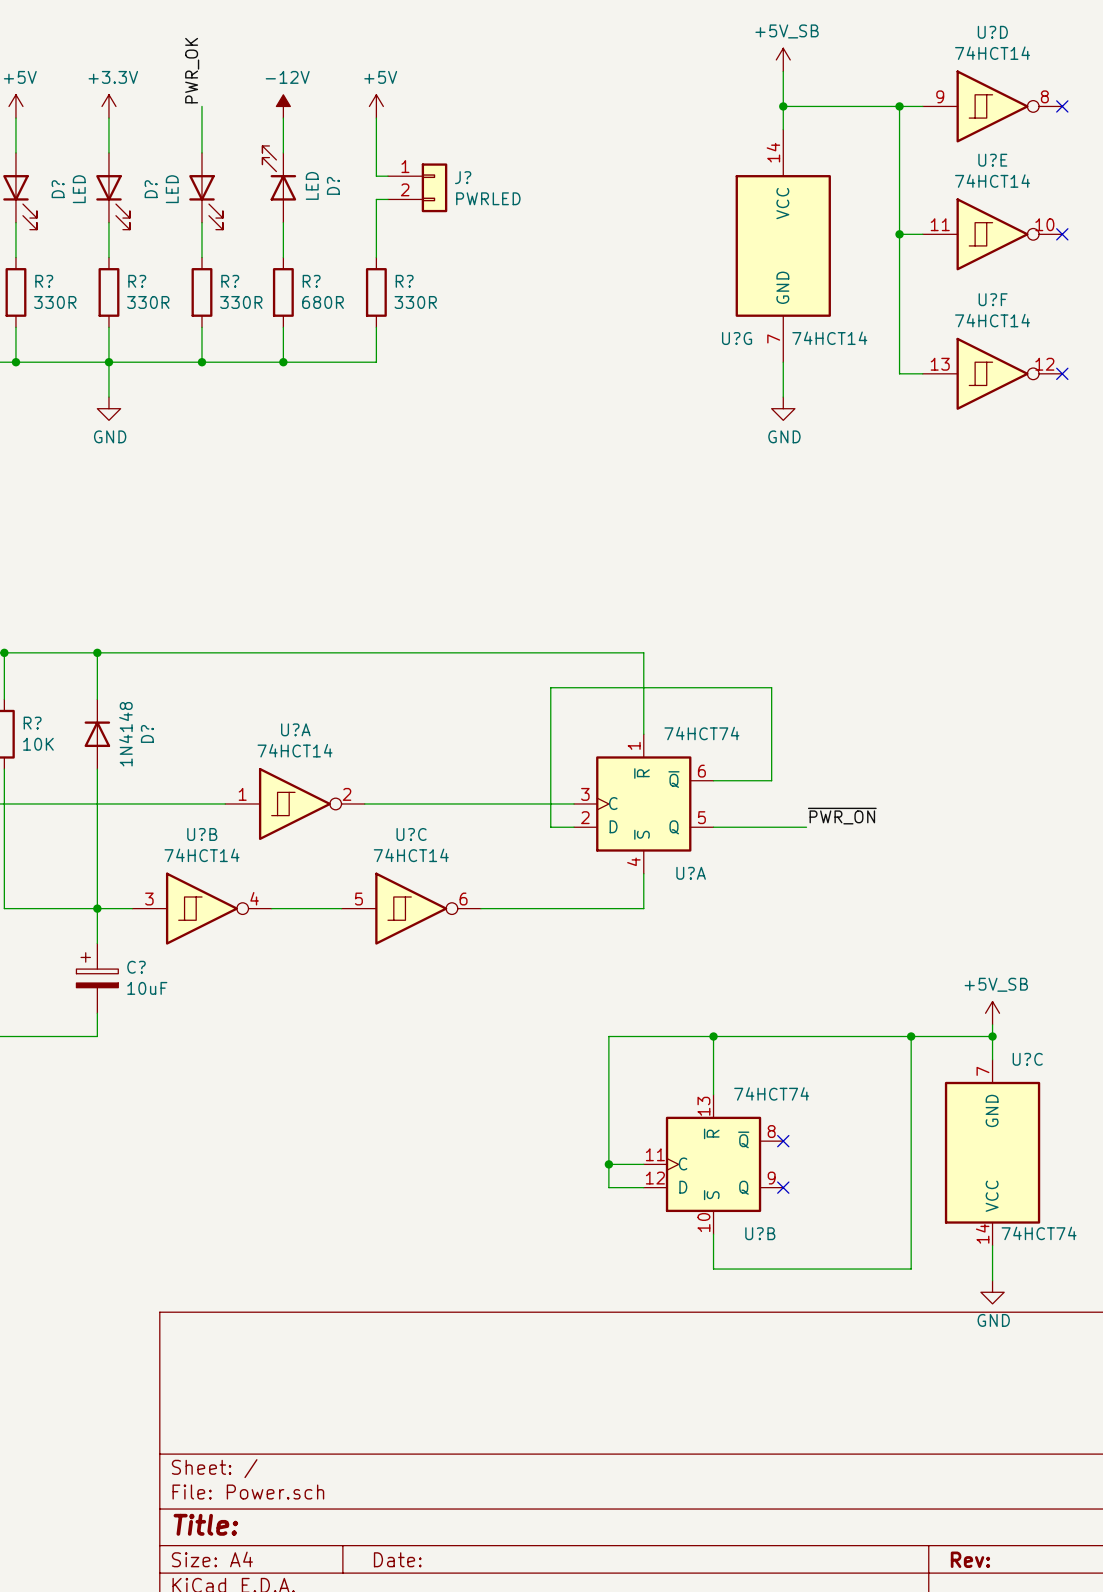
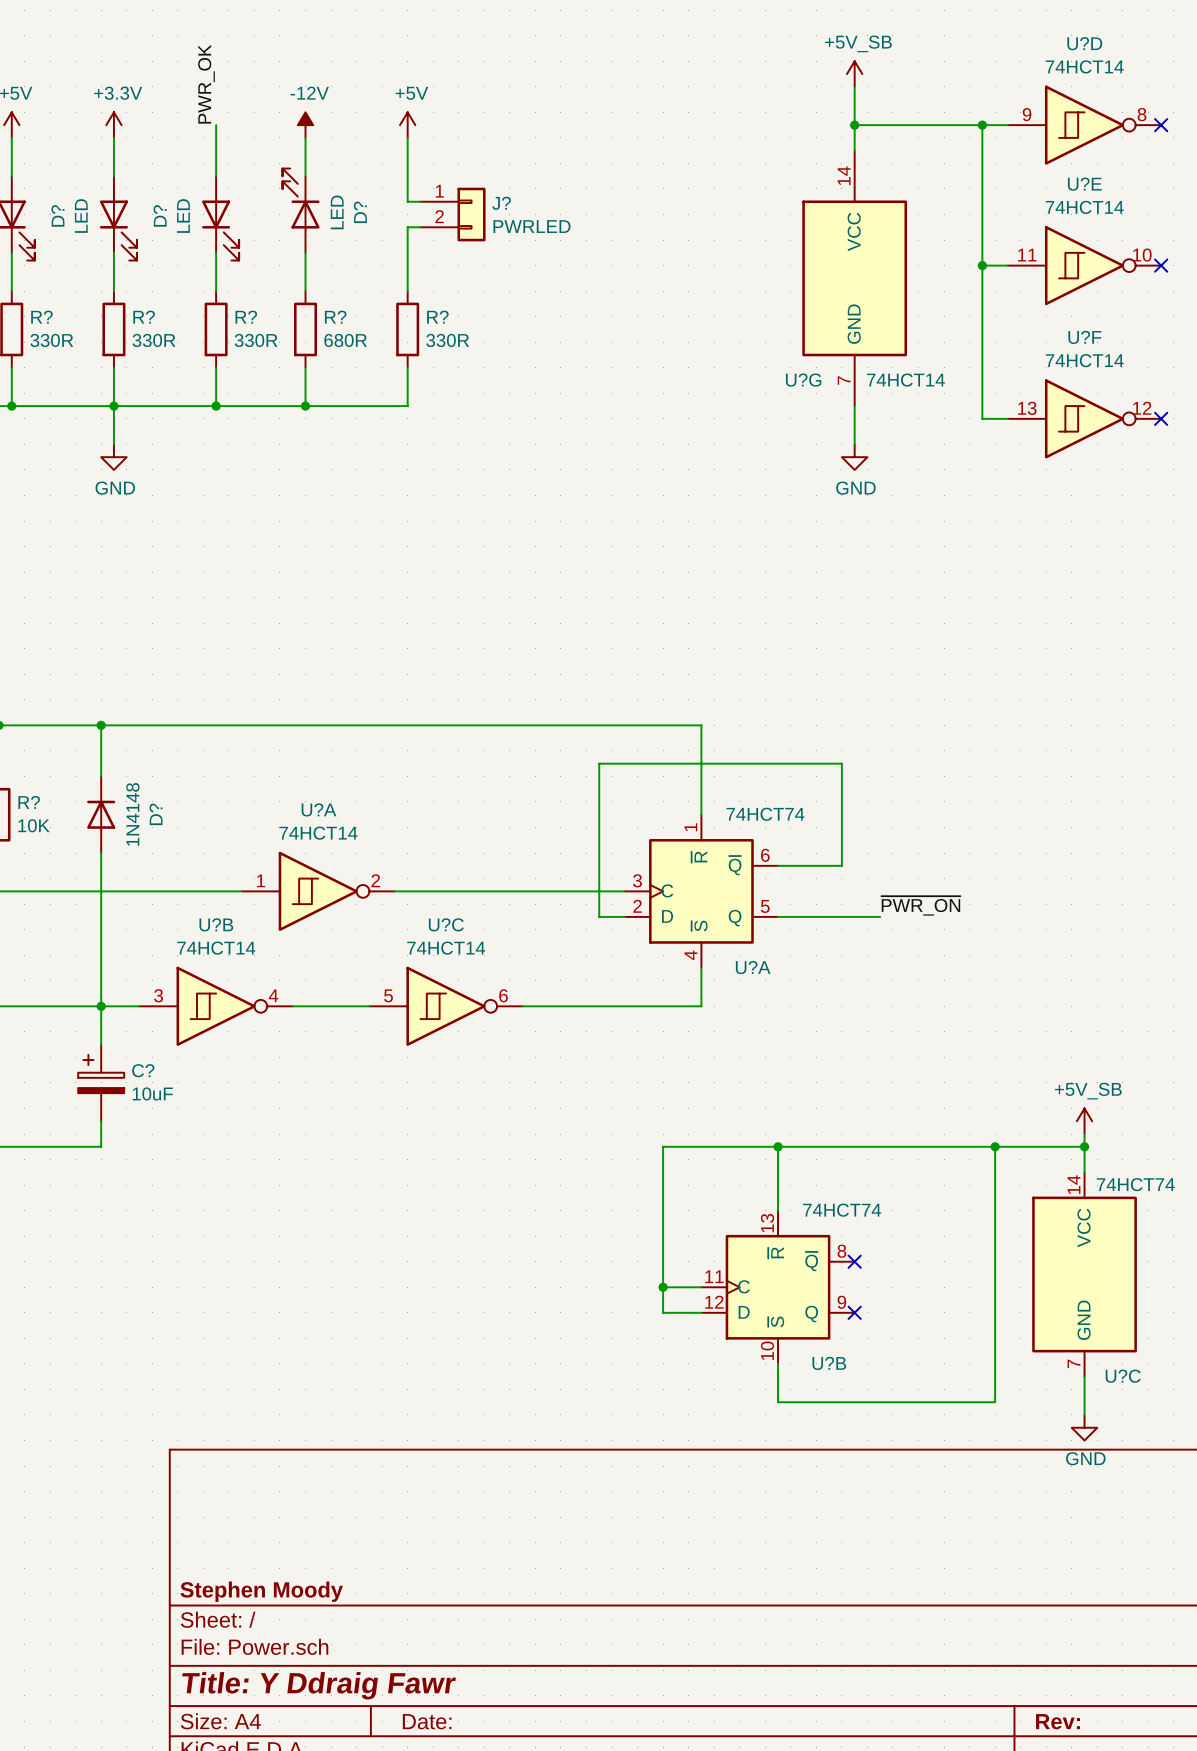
U?C name position: U?C (1027, 1059) -> U?C (1123, 1376)
U?C rotation: 0° (992, 1152) -> 180° (1084, 1274)
U?C value position: 74HCT74 (1039, 1233) -> 74HCT74 (1135, 1184)
title block: none -> Stephen Moody (261, 1591)
title block: Title: (205, 1524) -> Title: Y Ddraig Fawr (319, 1685)

